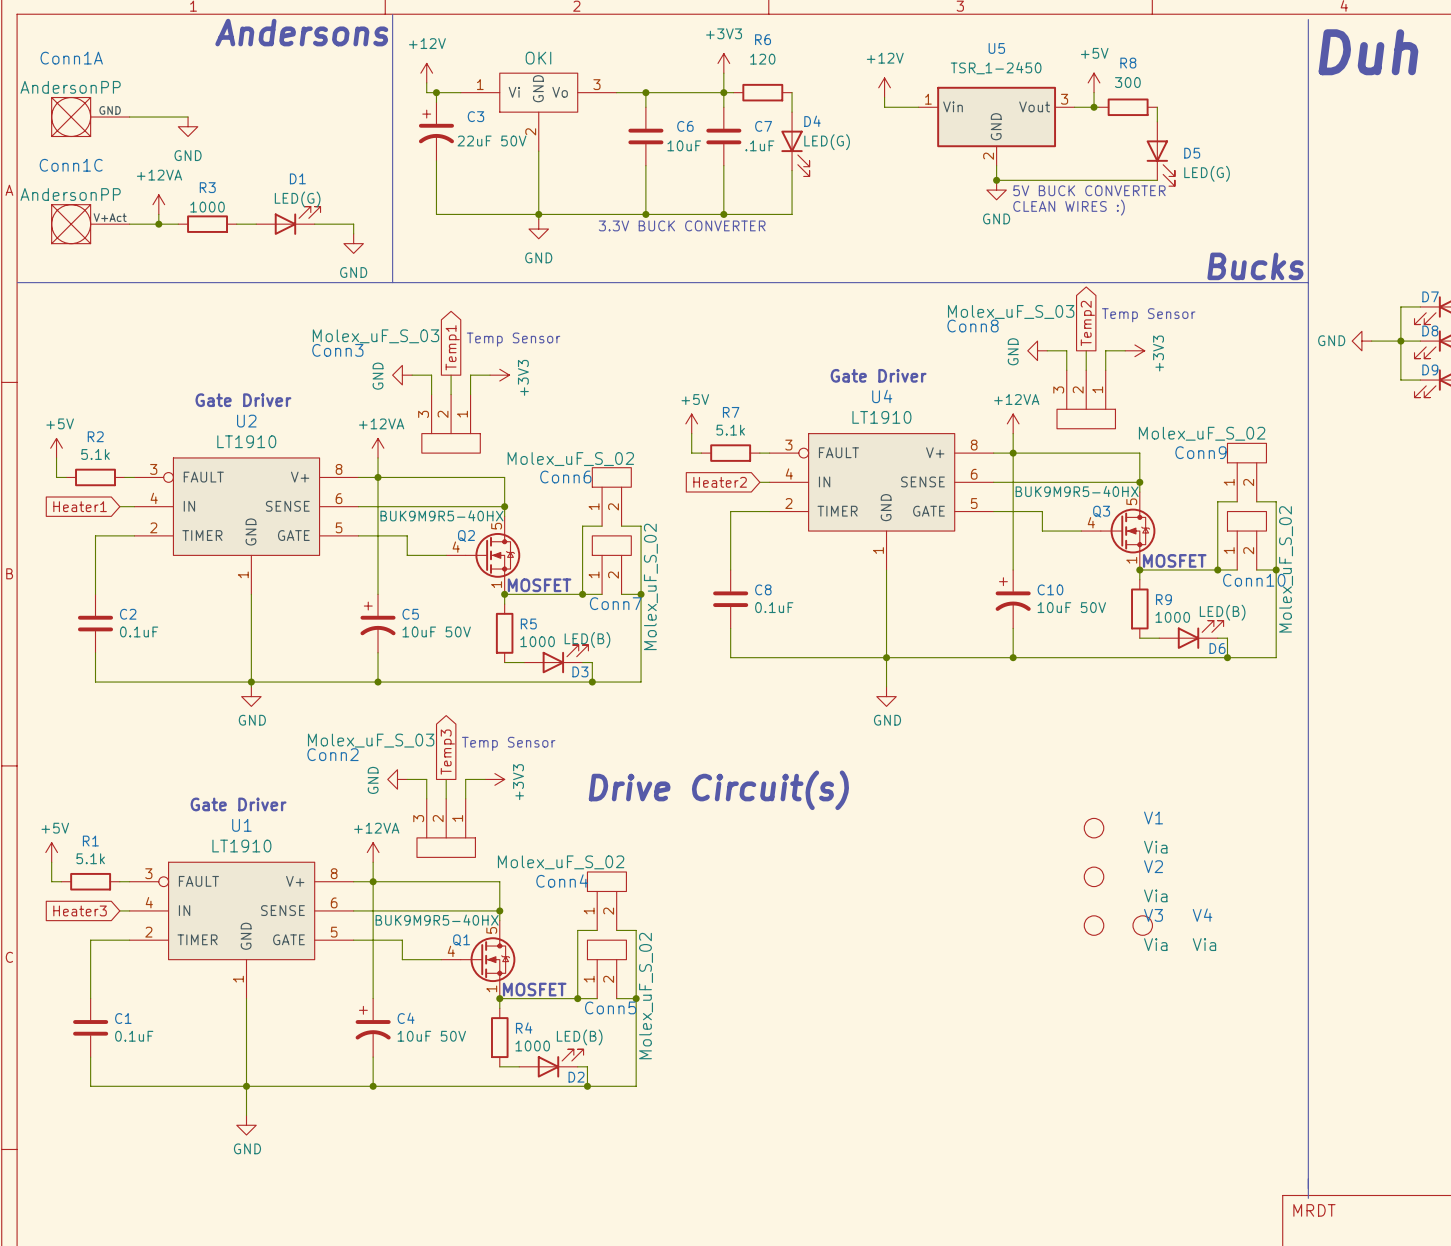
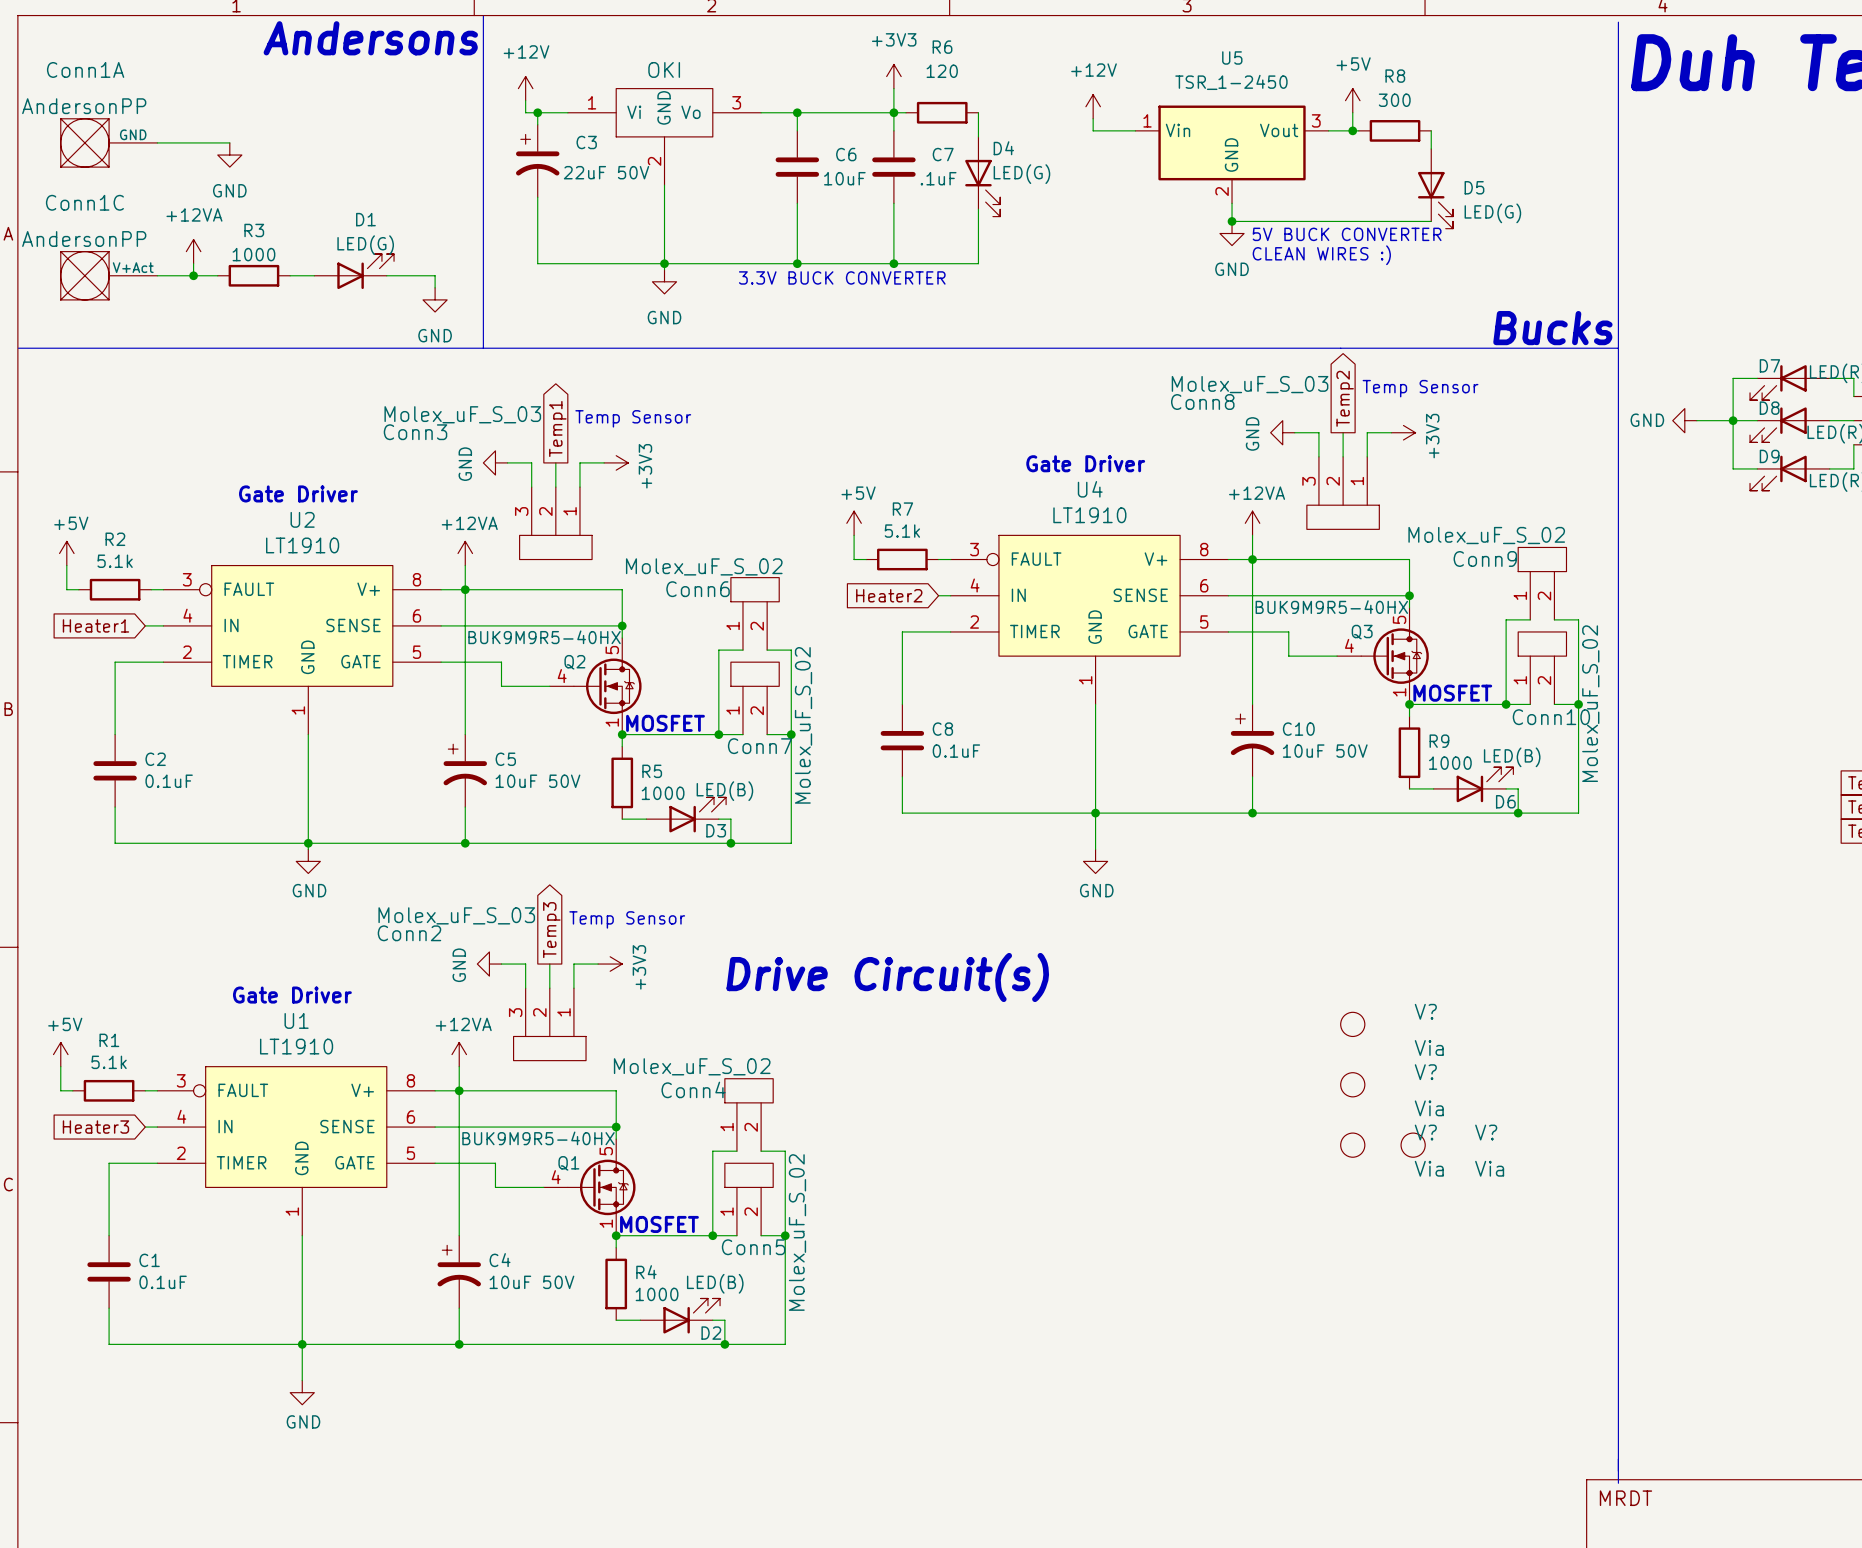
V1 name: V1 (1153, 817) -> V? (1425, 1011)
V2 name: V2 (1153, 866) -> V? (1425, 1072)
V3 name: V3 (1153, 915) -> V? (1425, 1132)
V4 name: V4 (1202, 915) -> V? (1486, 1132)

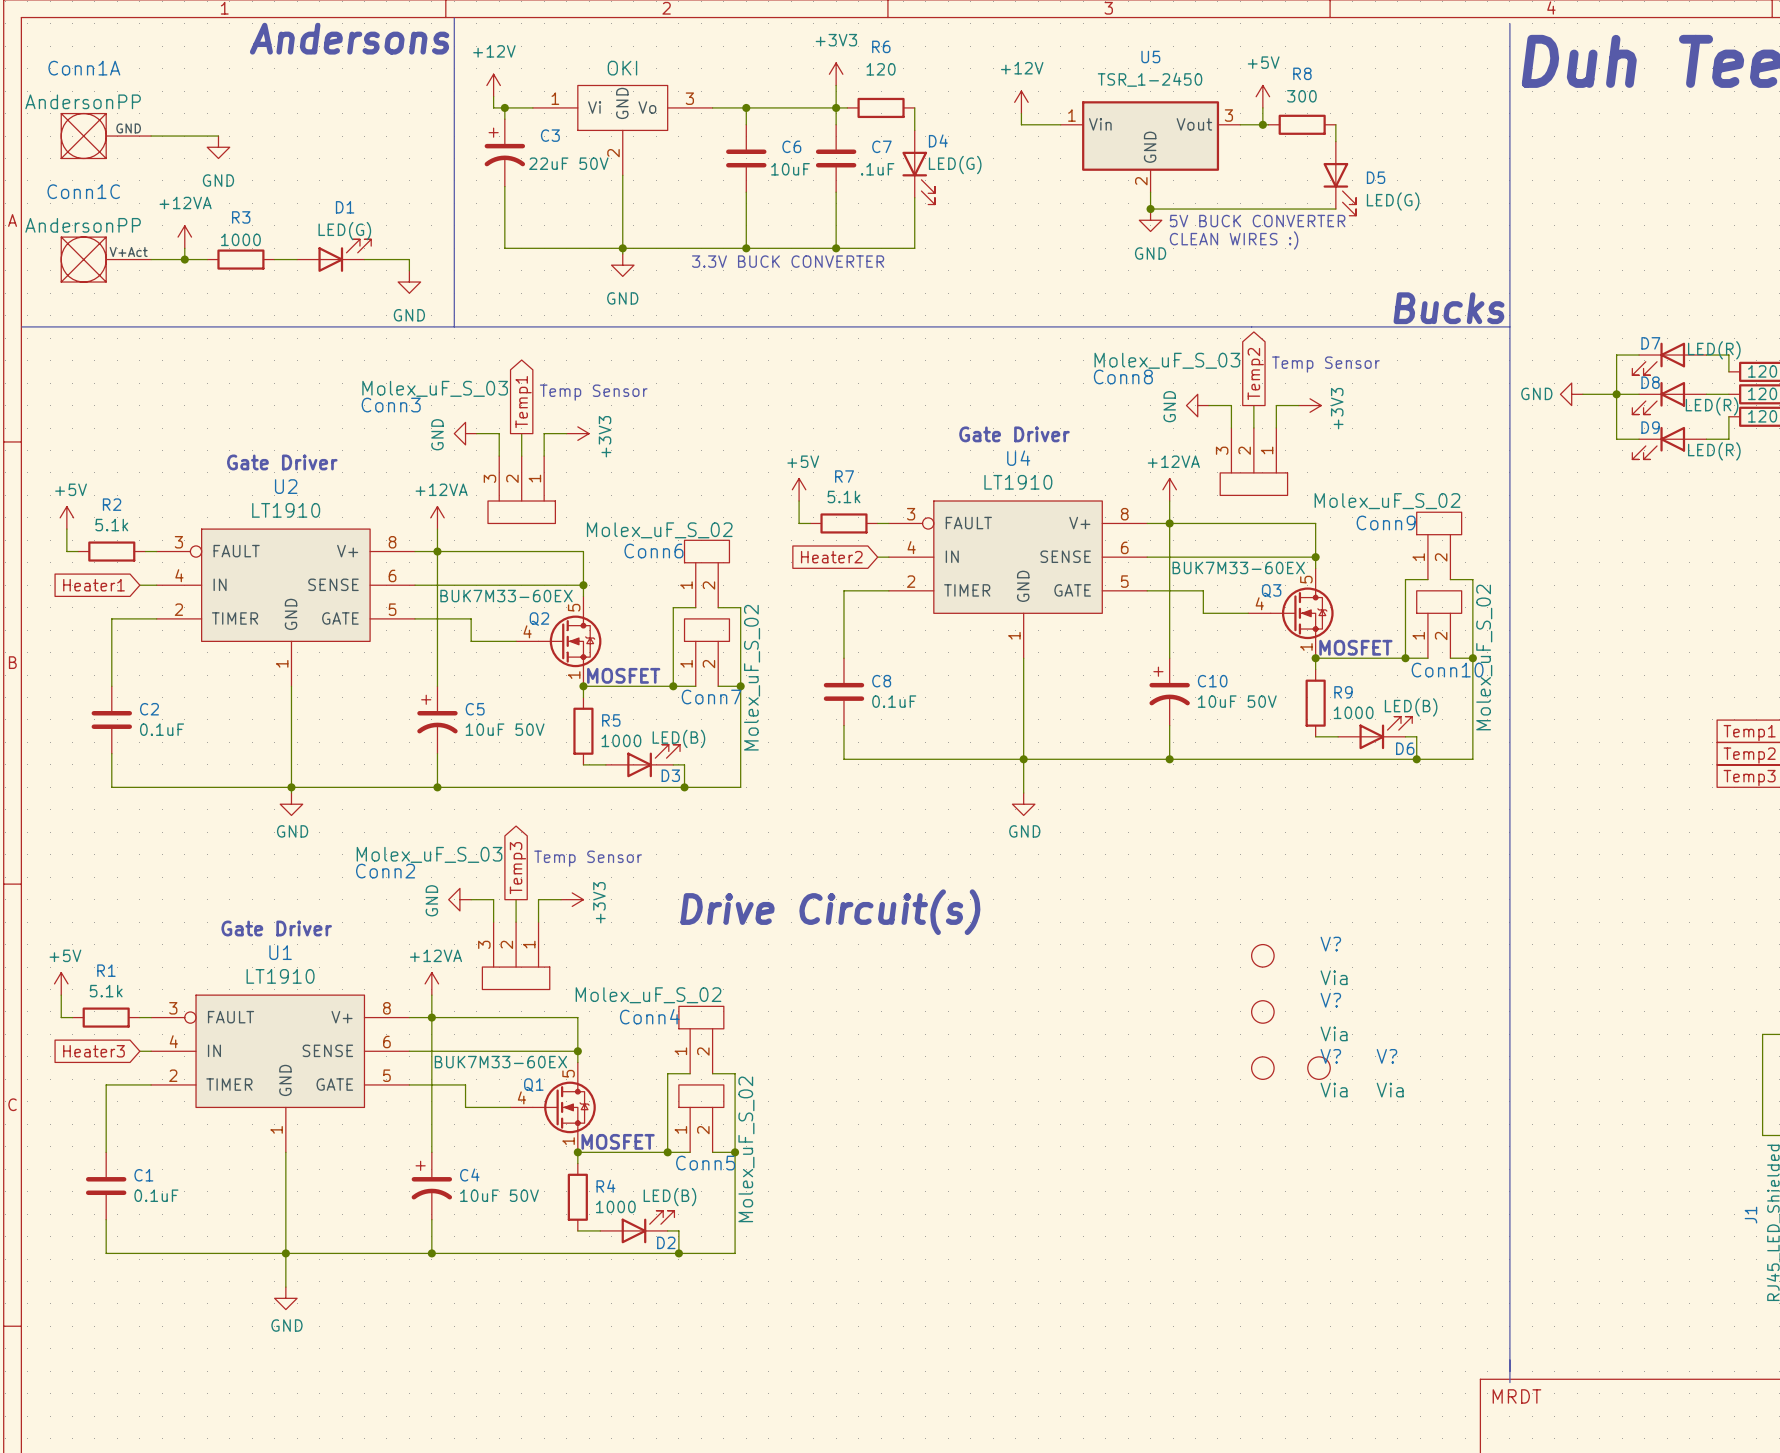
Q3 value: BUK9M9R5-40HX (1331, 607) -> BUK7M33-60EX (1238, 567)
Q2 value: BUK9M9R5-40HX (544, 637) -> BUK7M33-60EX (506, 596)
Q1 value: BUK9M9R5-40HX (538, 1138) -> BUK7M33-60EX (500, 1062)

